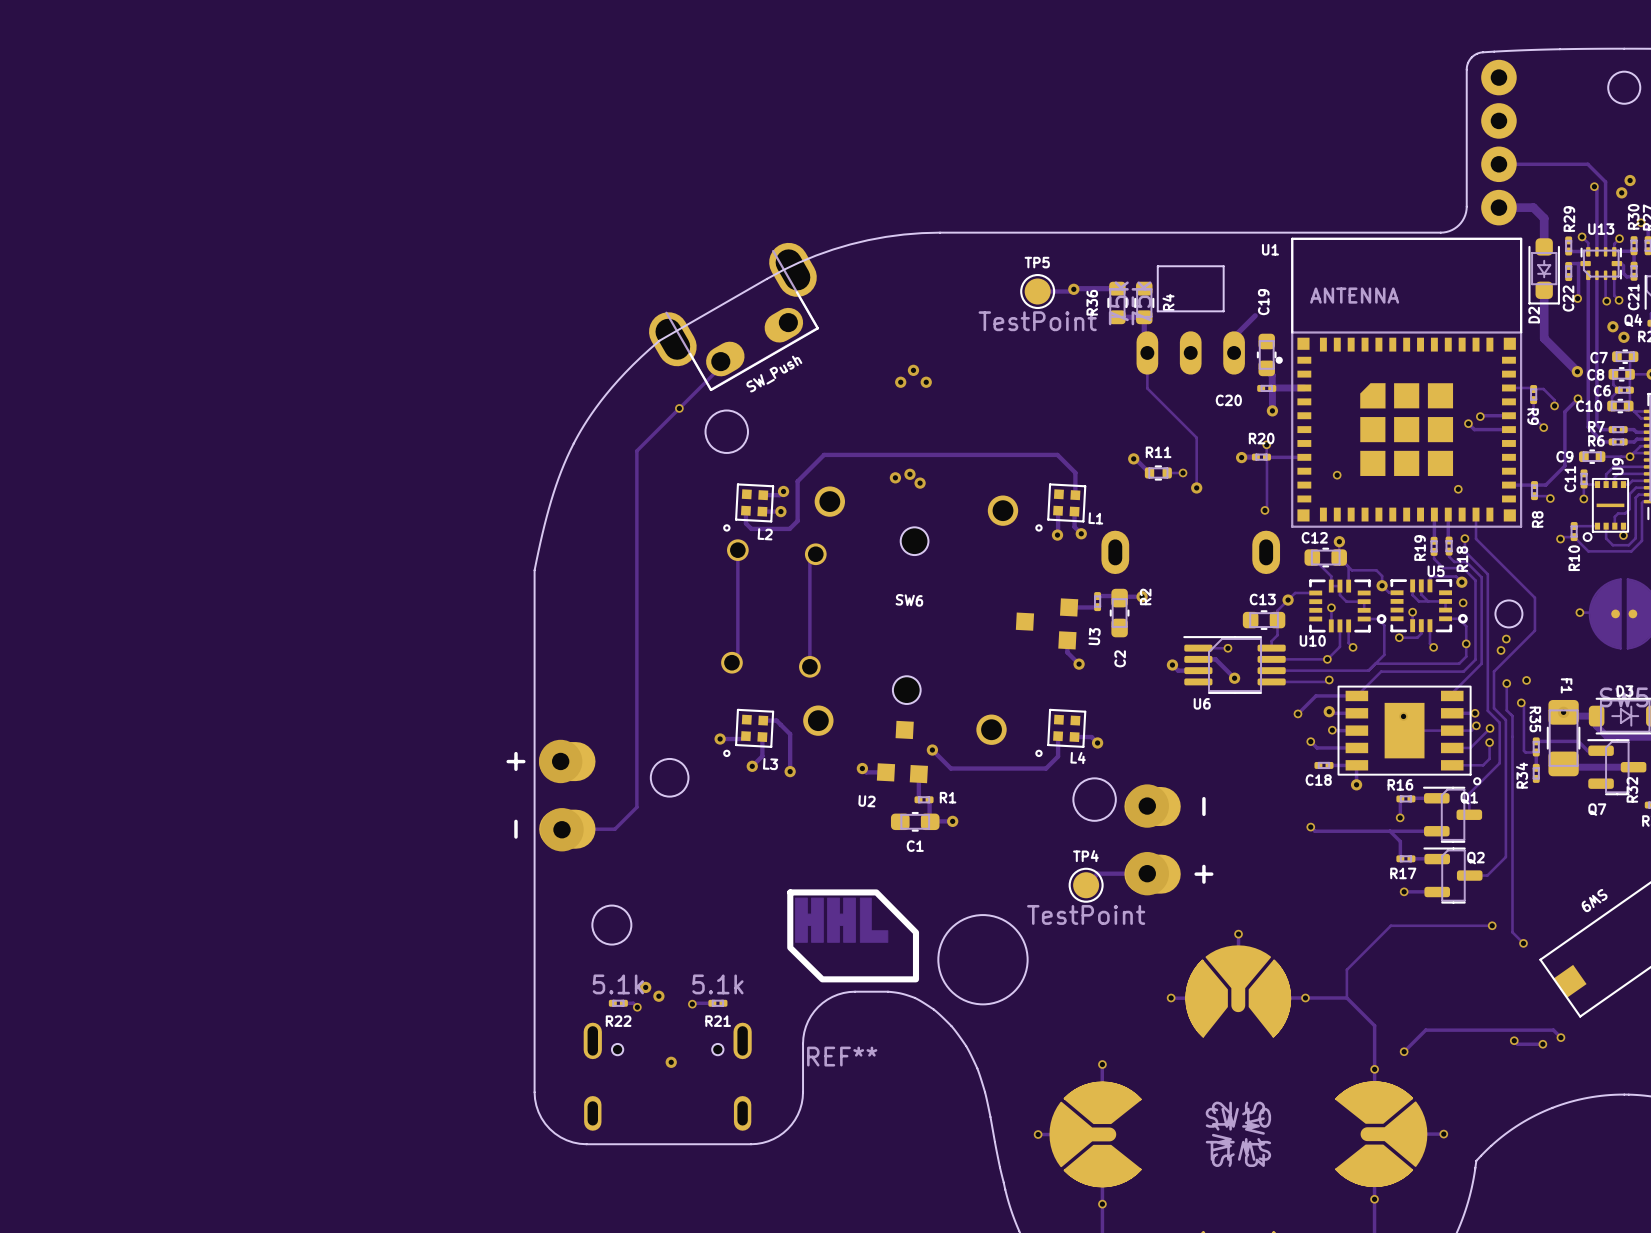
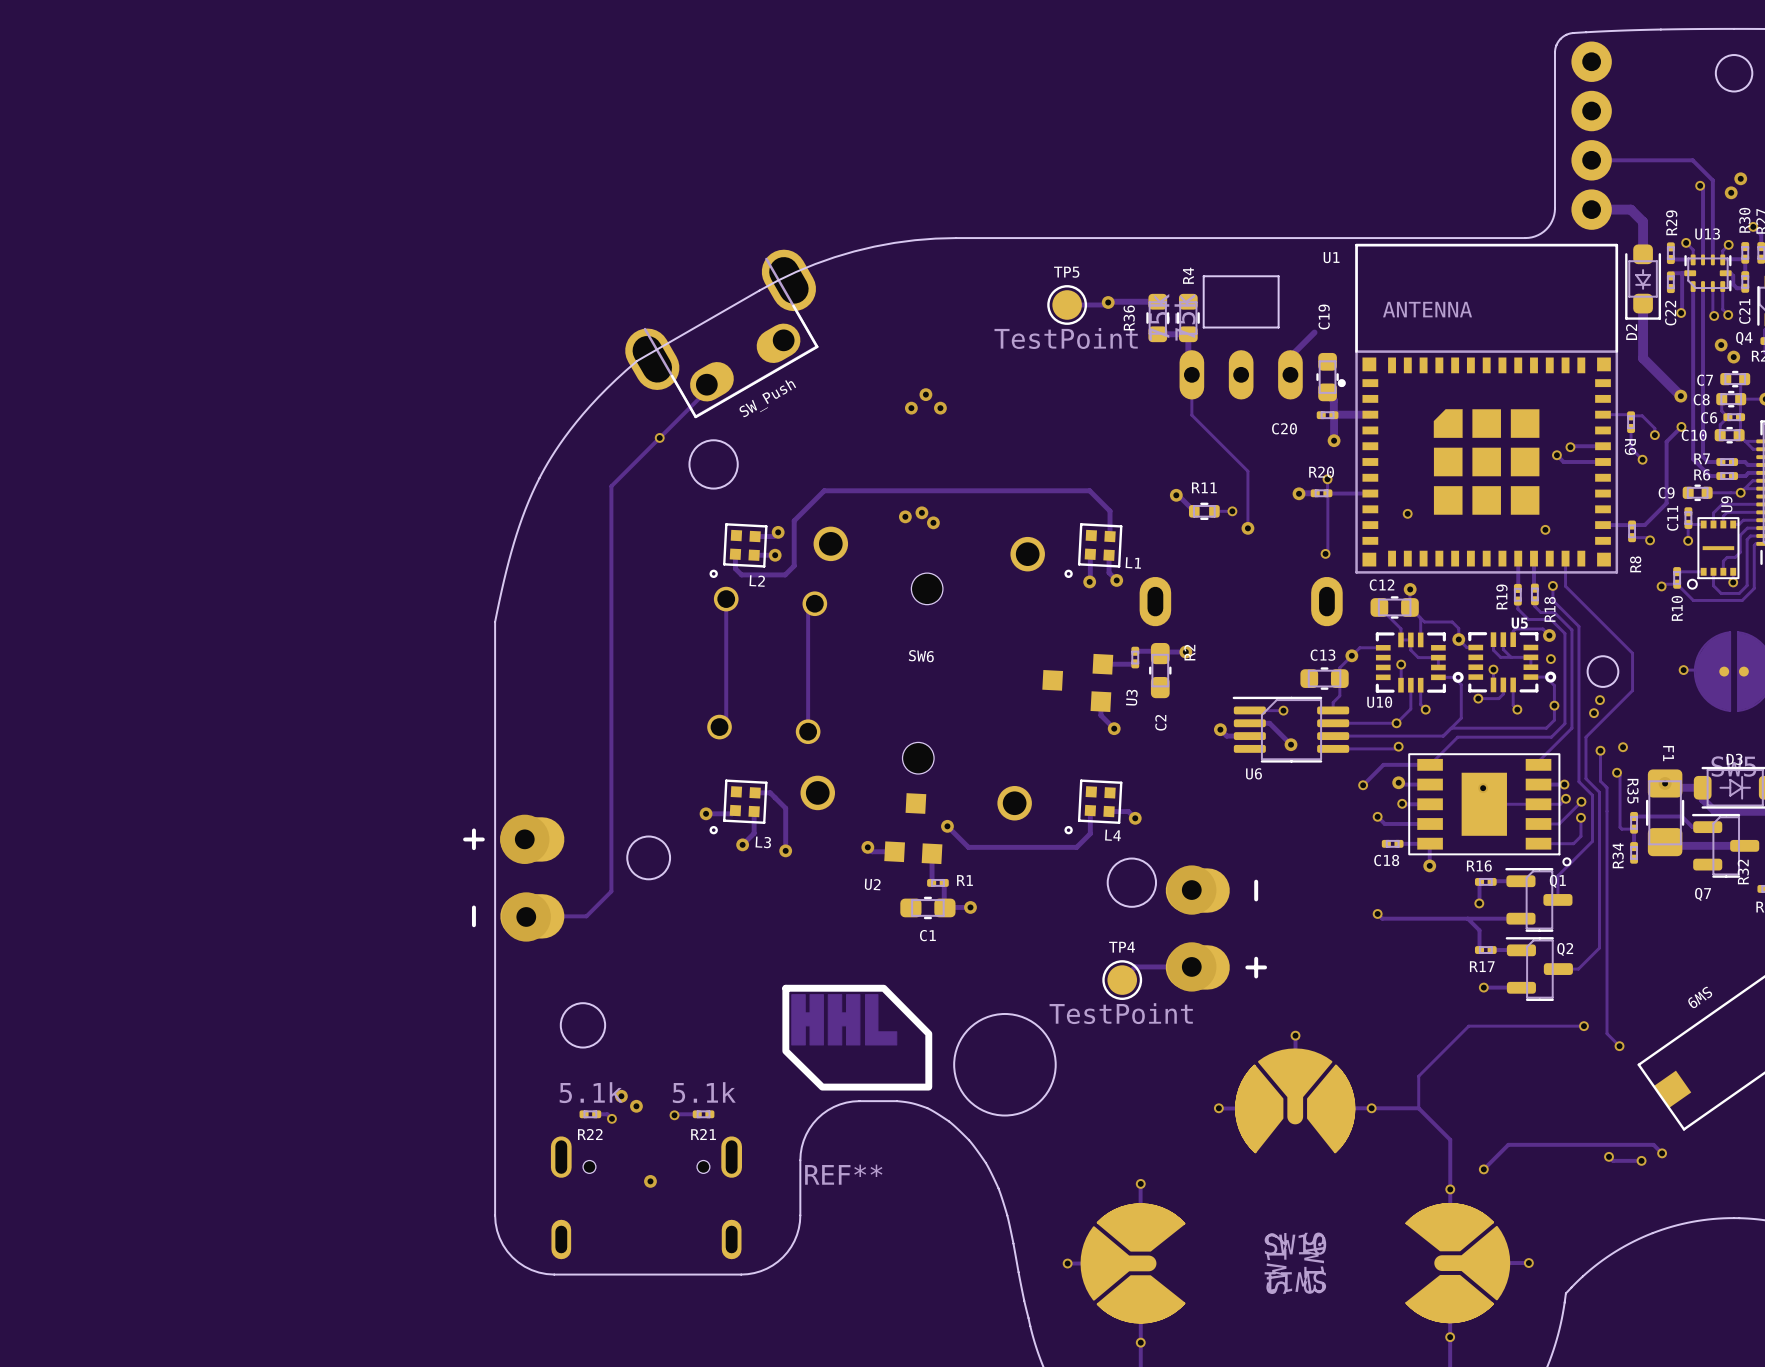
R4 name position: R4 (1168, 302) -> R4 (1188, 275)

